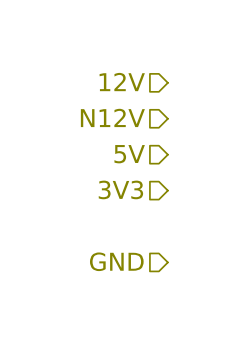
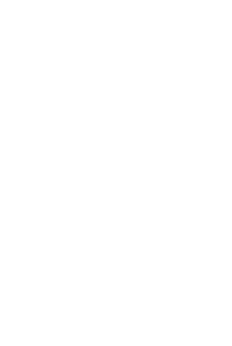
hierarchical label: 12V (122, 82) -> none
hierarchical label: N12V (112, 117) -> none
hierarchical label: 5V (129, 154) -> none
hierarchical label: 3V3 (120, 189) -> none
hierarchical label: GND (116, 261) -> none

